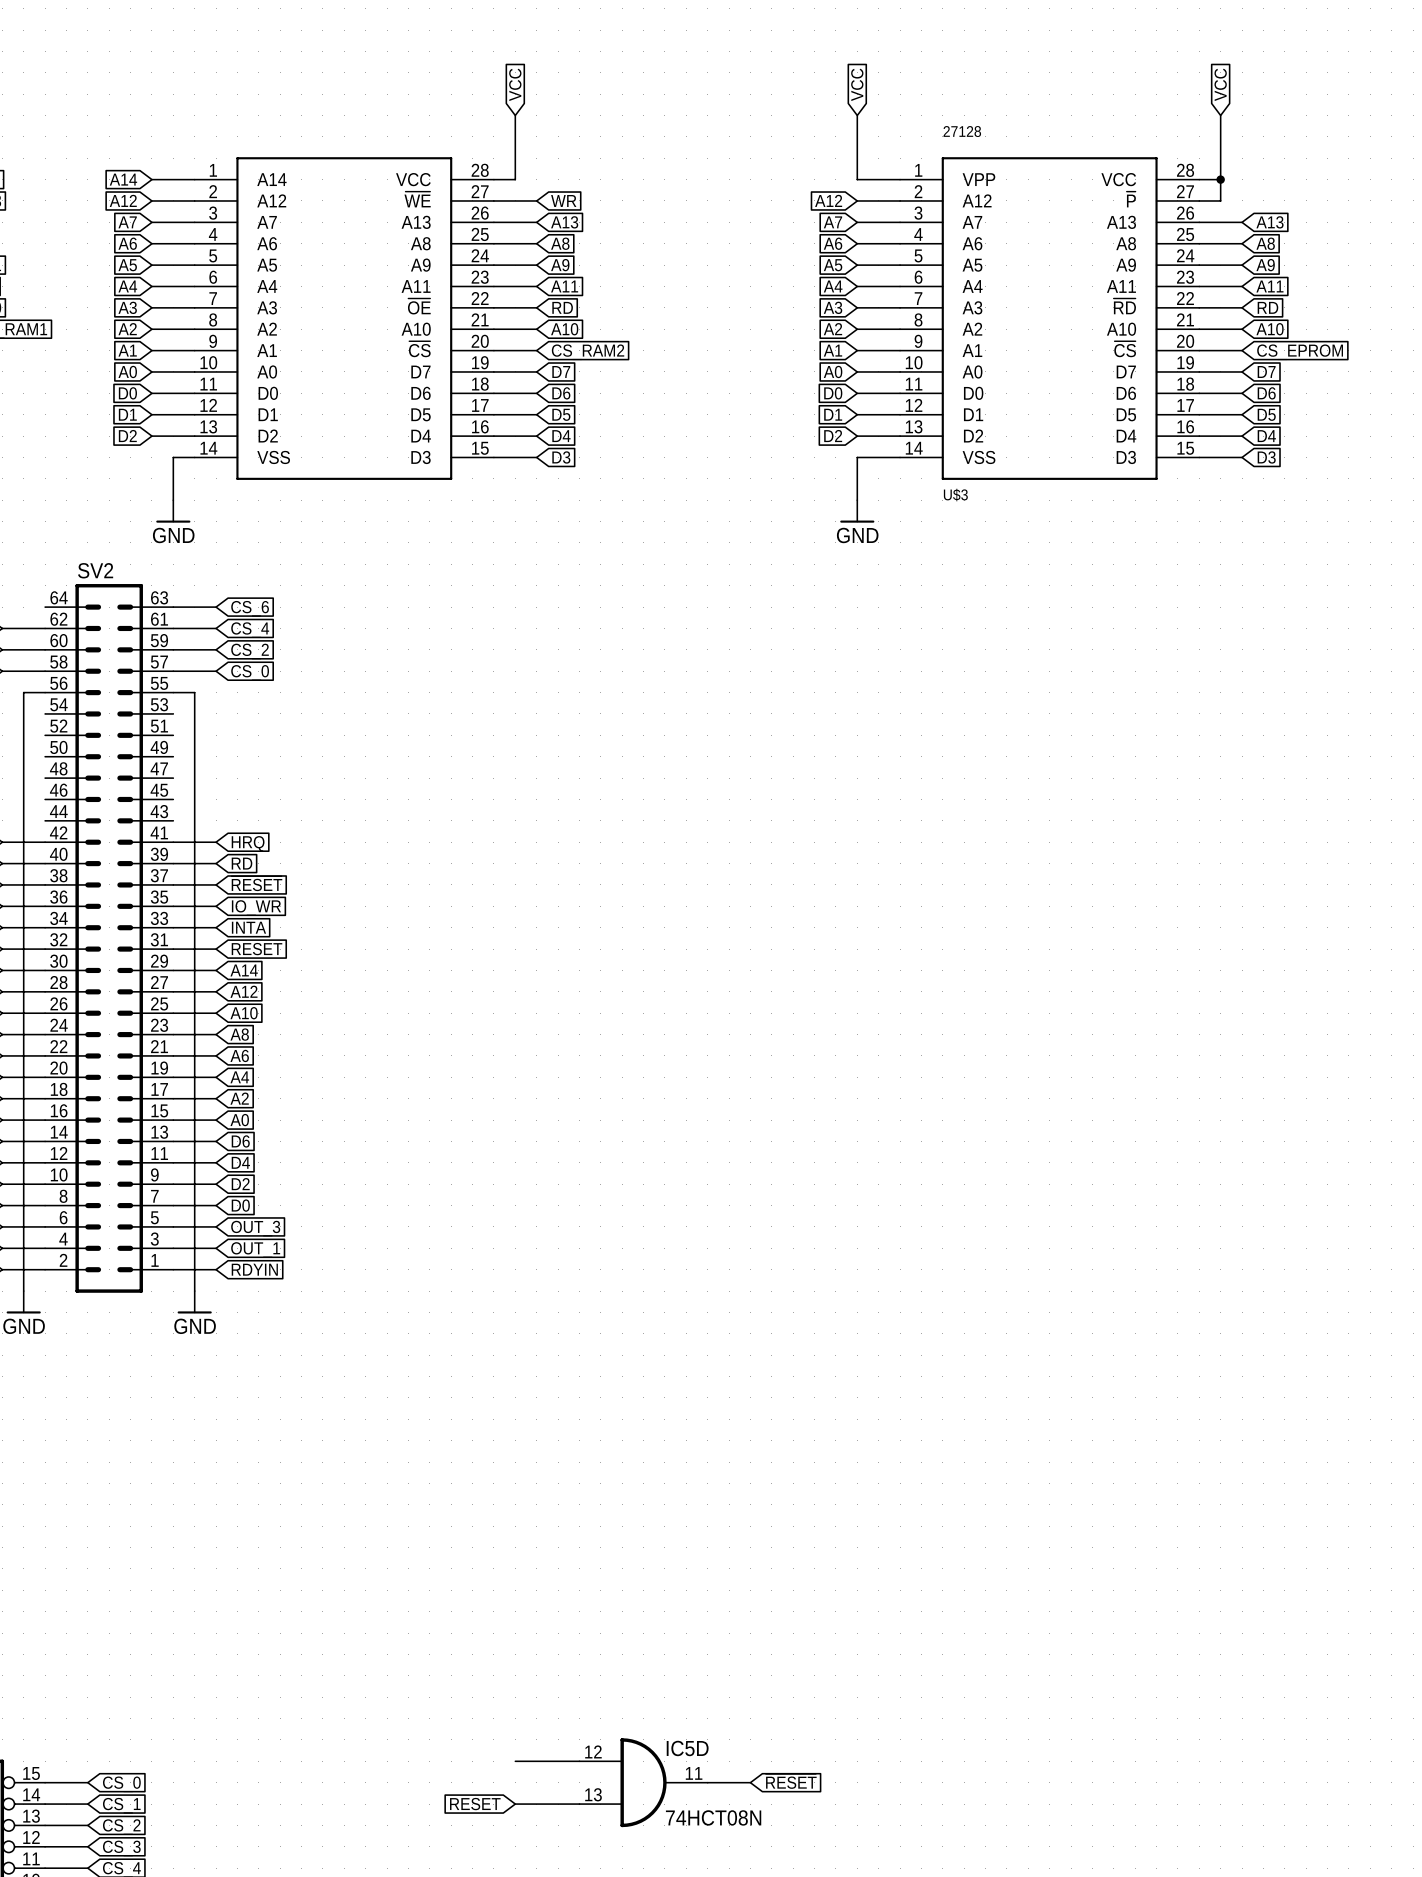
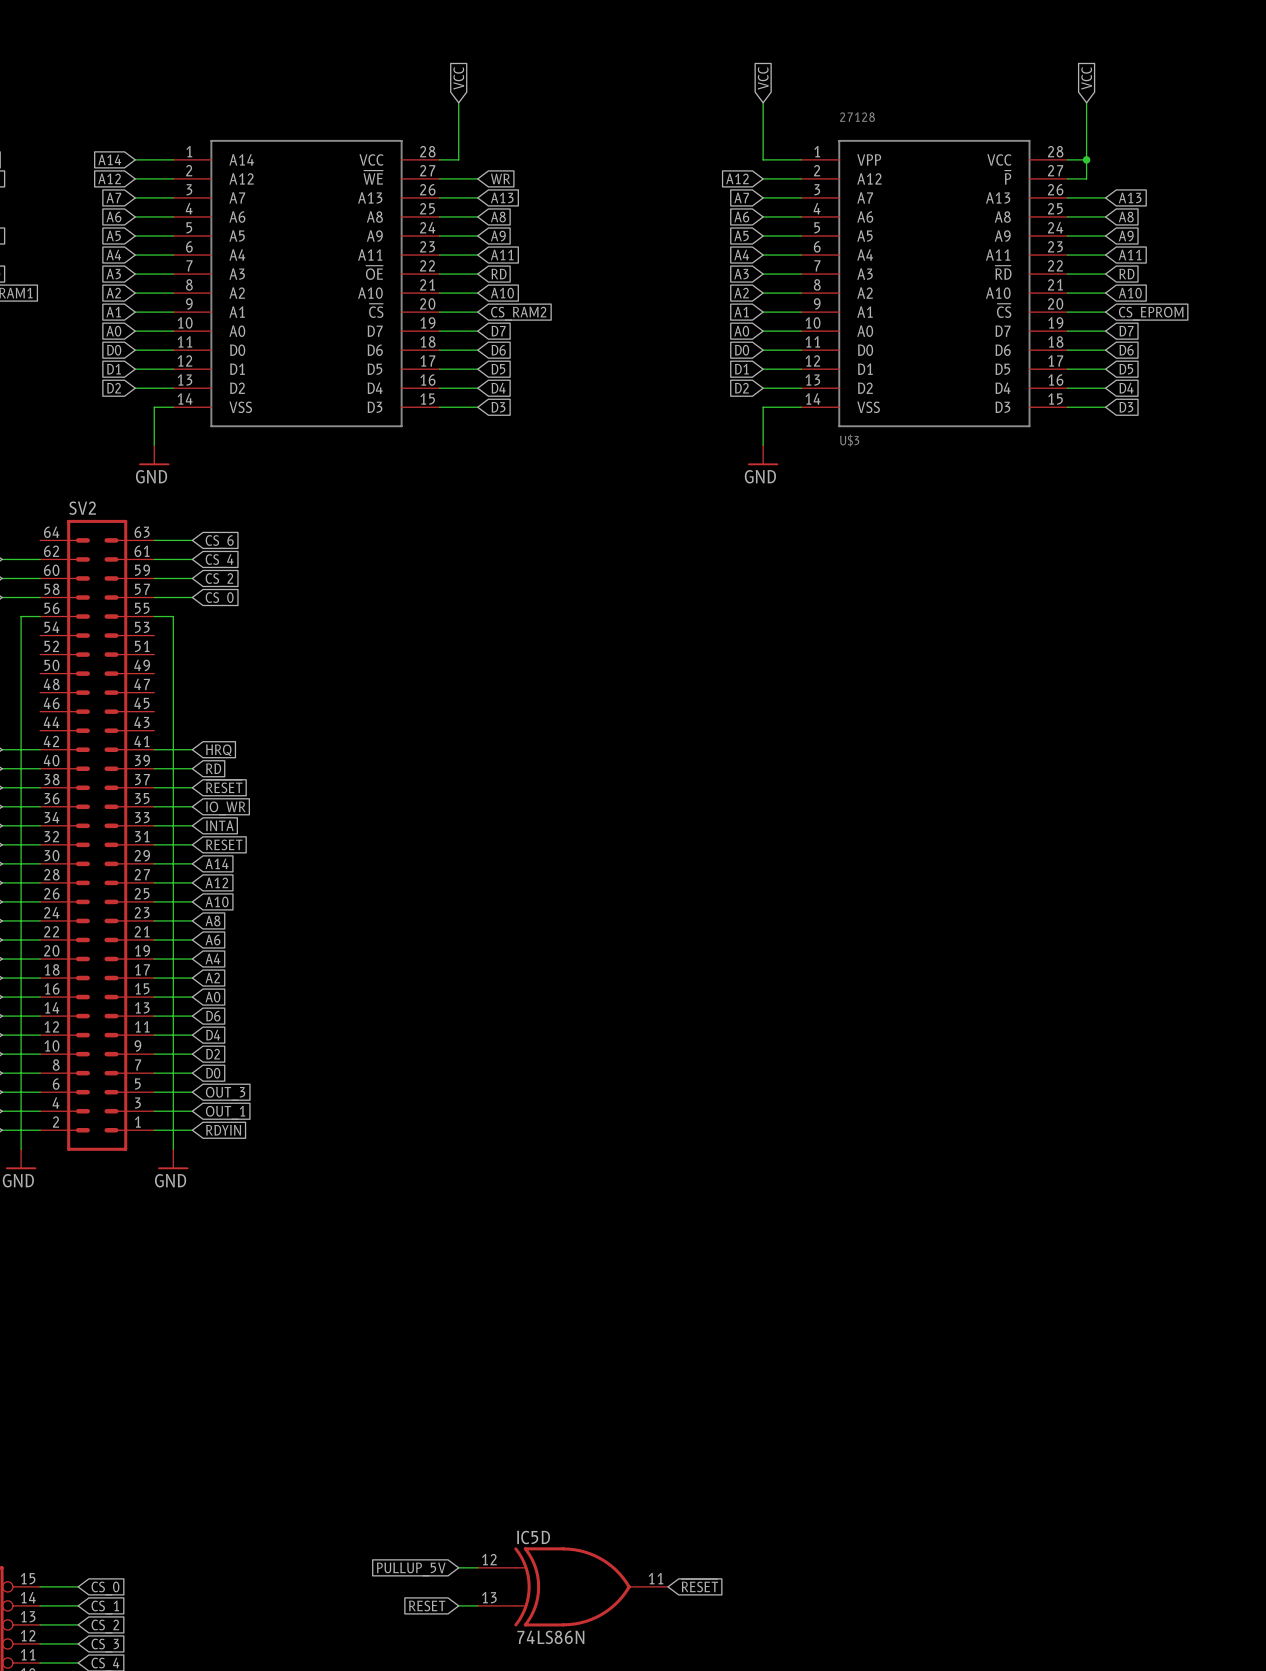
IC5D symbol: [579, 1738, 708, 1828] -> [477, 1547, 669, 1627]
IC5D name position: IC5D (687, 1748) -> IC5D (533, 1537)
global label: none -> PULLUP_5V (411, 1569)
IC5D value: 74HCT08N (713, 1817) -> 74LS86N (550, 1637)

